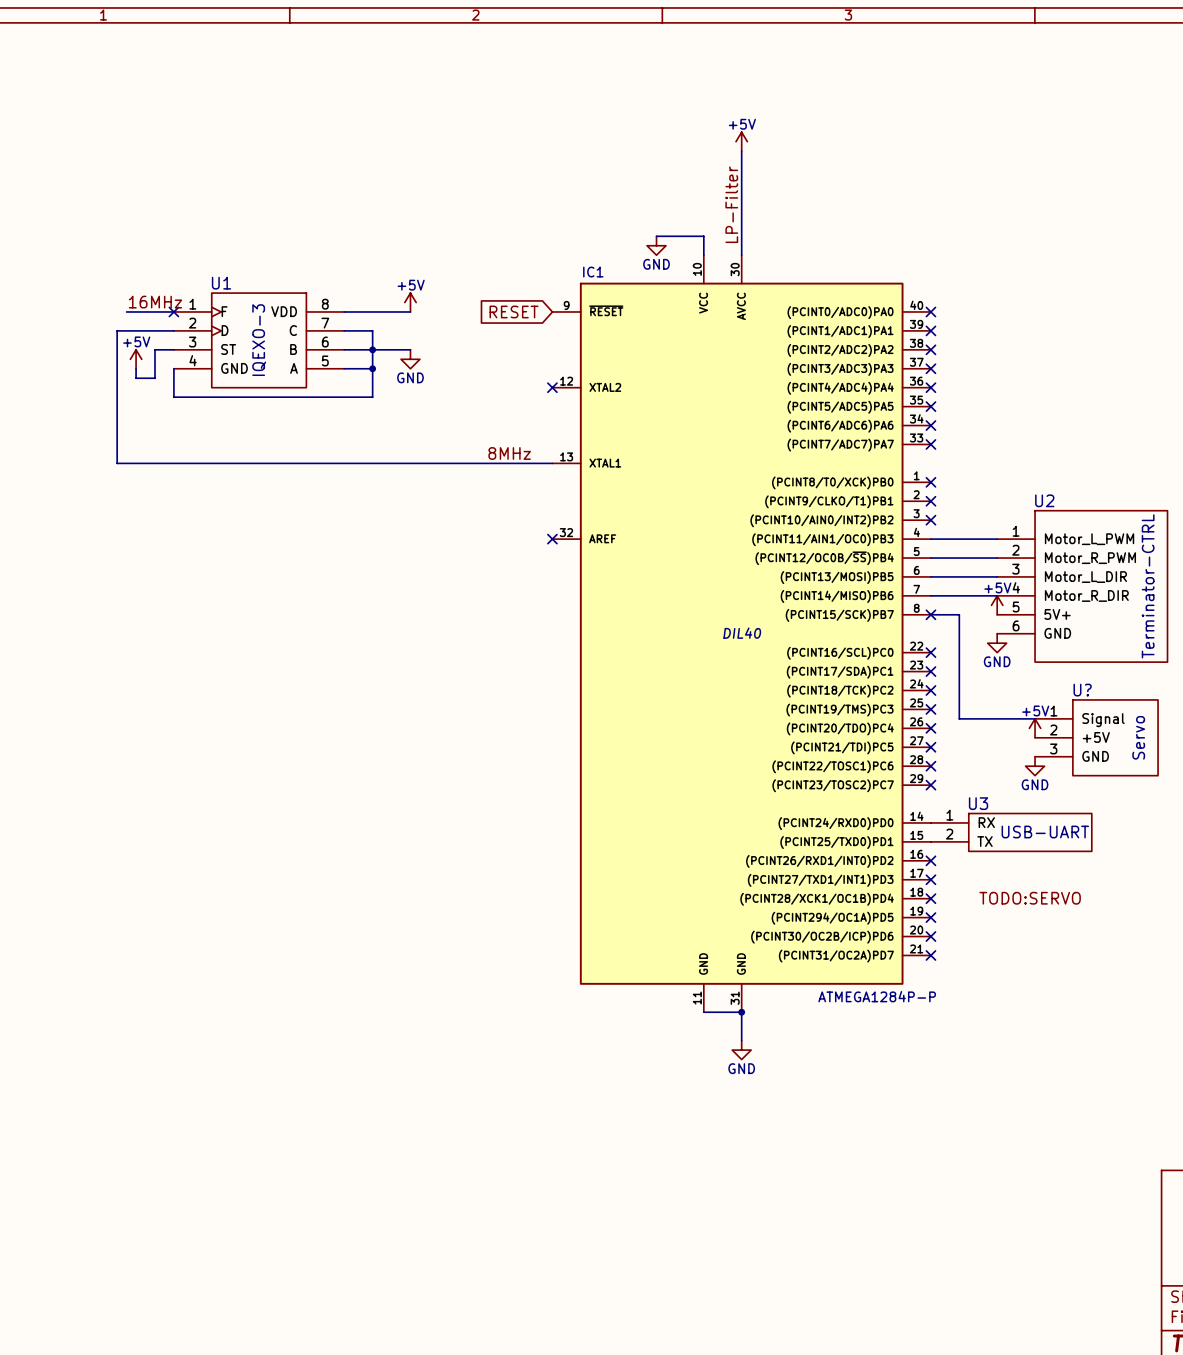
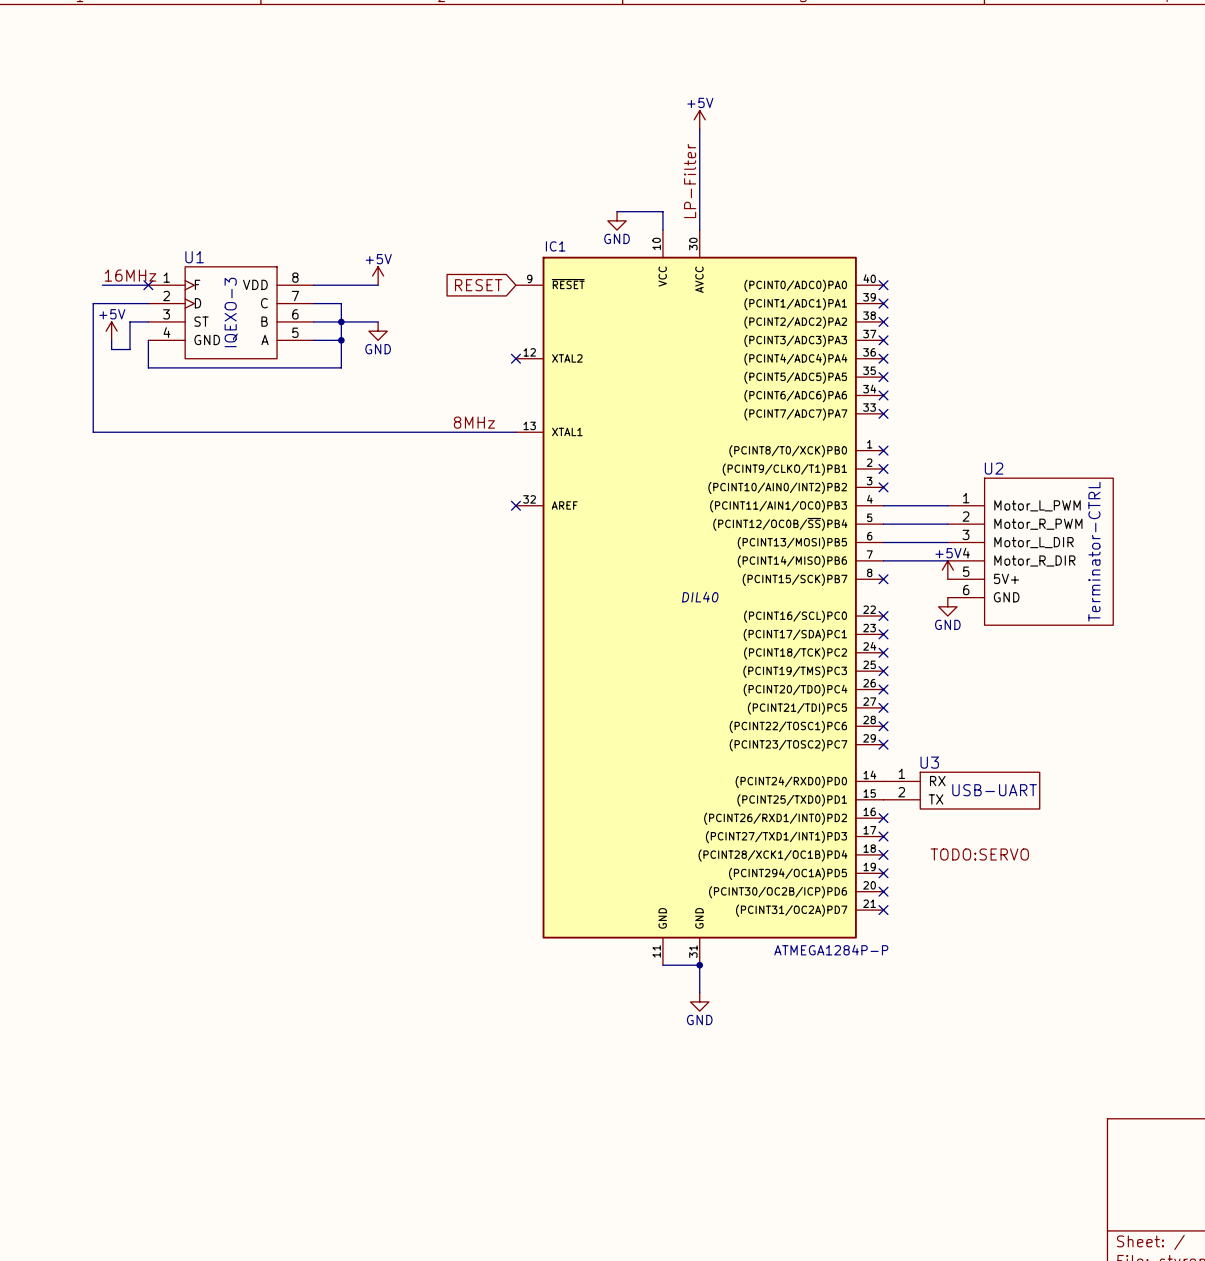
wire: (930, 614) (959, 614) (959, 718) (1035, 718) -> none
power symbol: +5V (1035, 728) -> none
U?: Servo (1096, 737) -> none
power symbol: GND (1035, 766) -> none

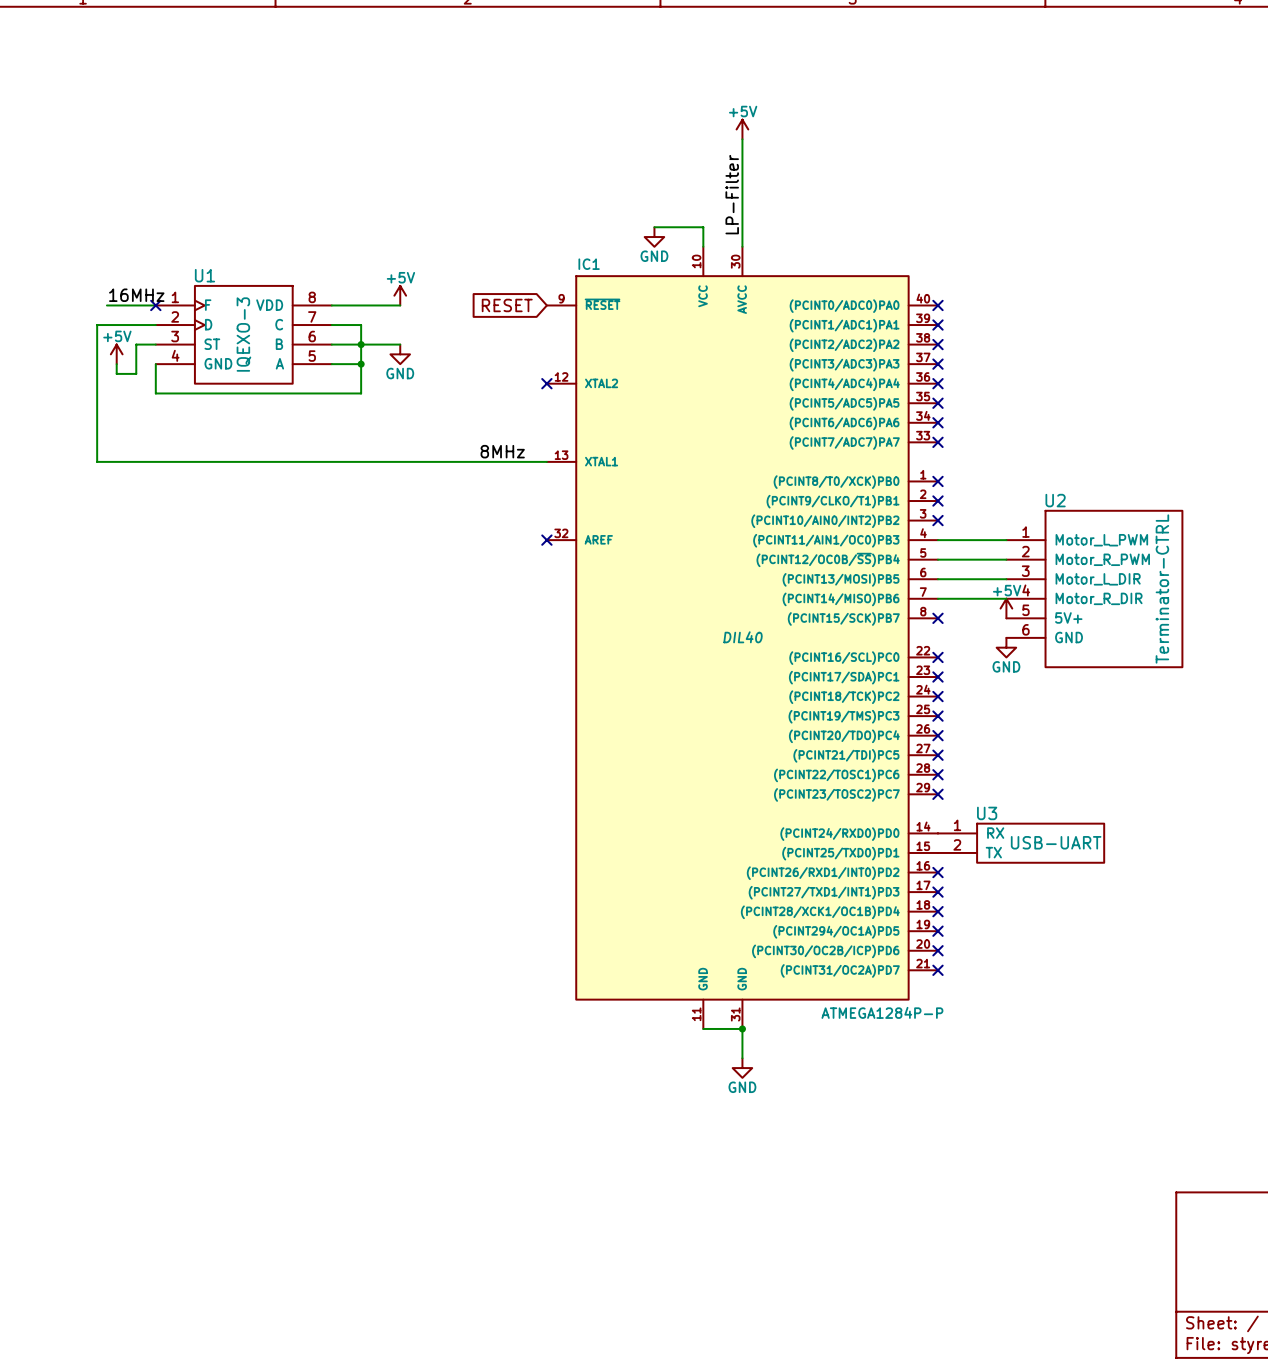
label: TODO:SERVO (979, 854) -> none

